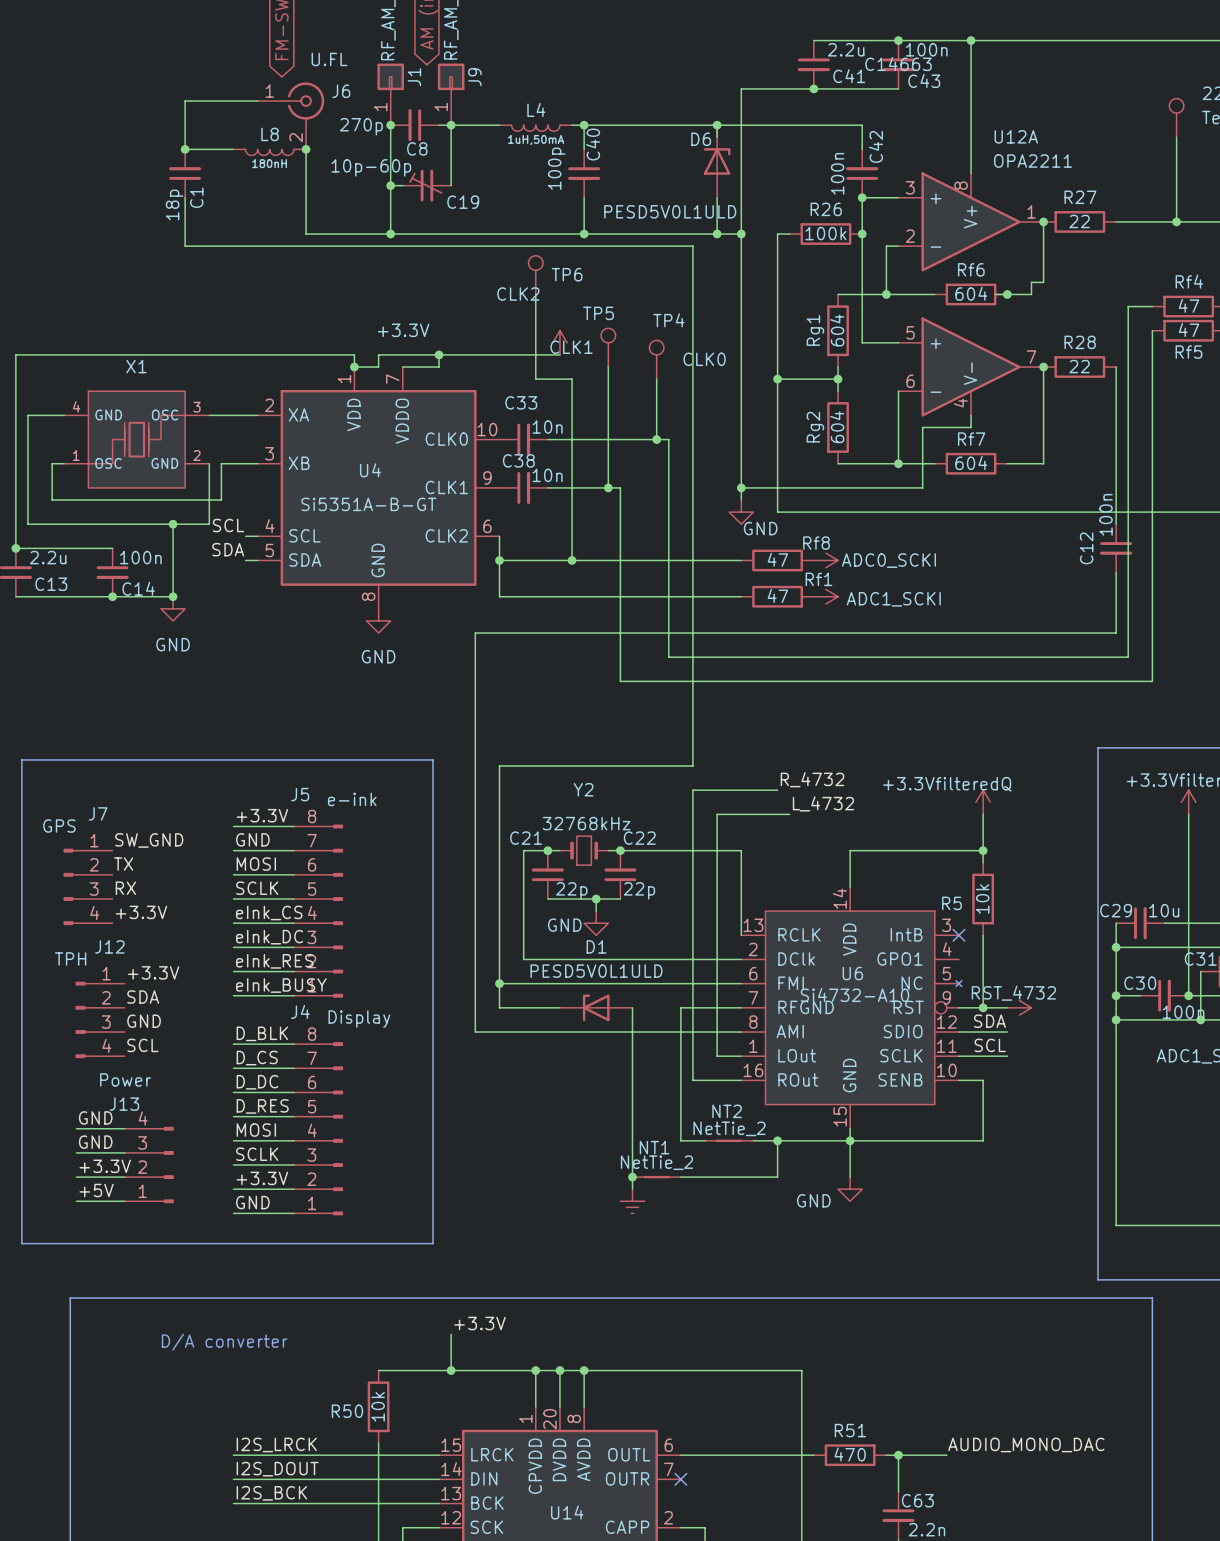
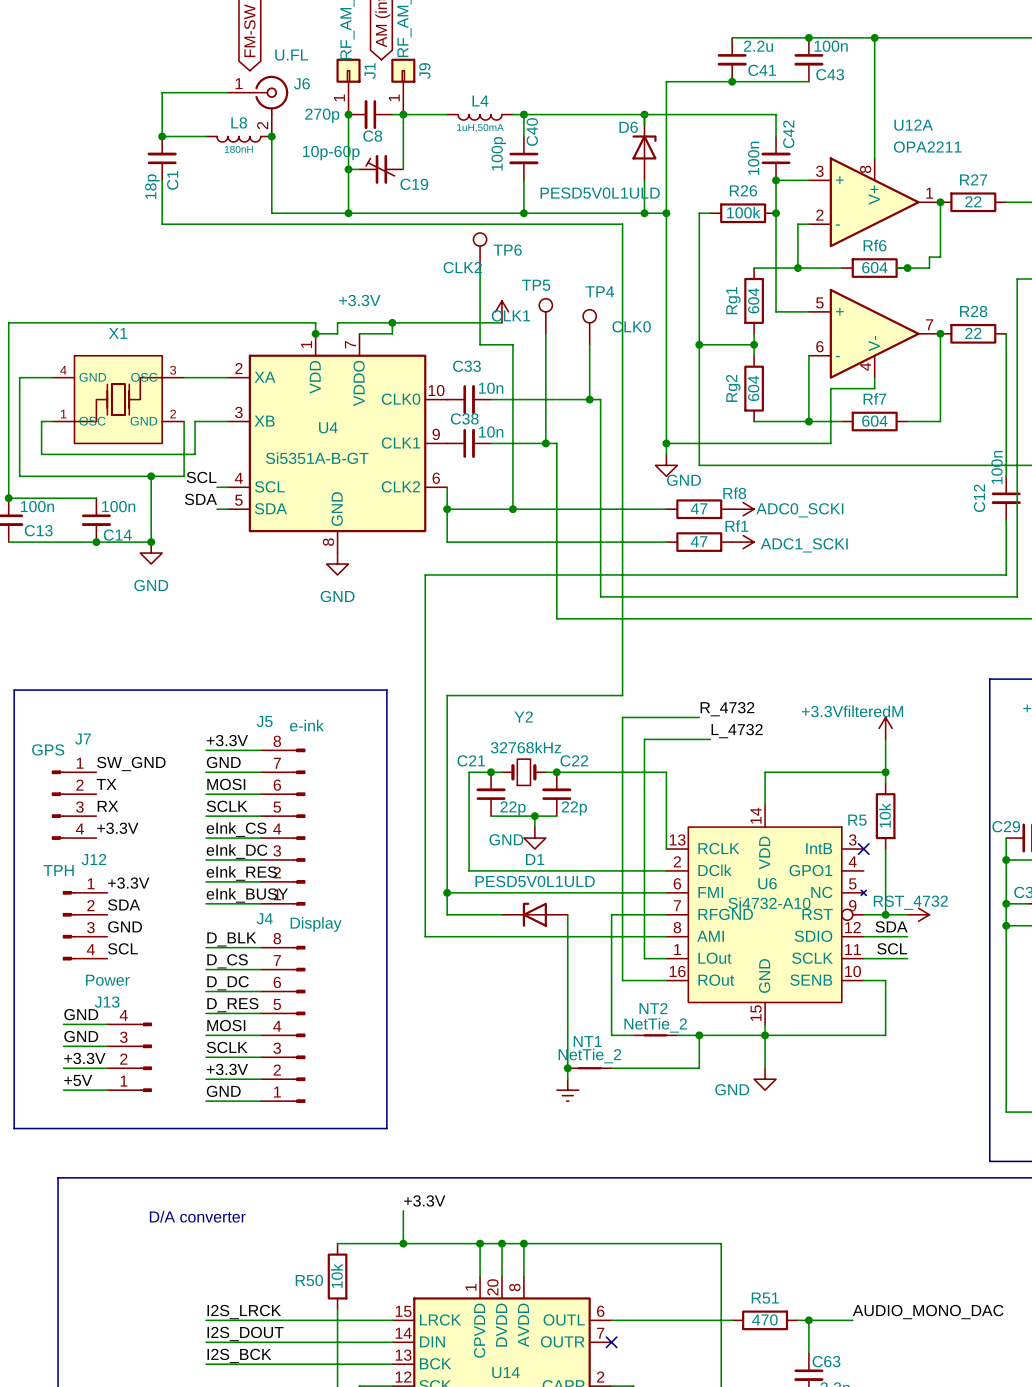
C43 text: C14663 (898, 64) -> none
C13 value: 2.2u (48, 557) -> 100n (37, 506)
power symbol: +3.3VfilteredQ (983, 802) -> +3.3VfilteredM (885, 728)

